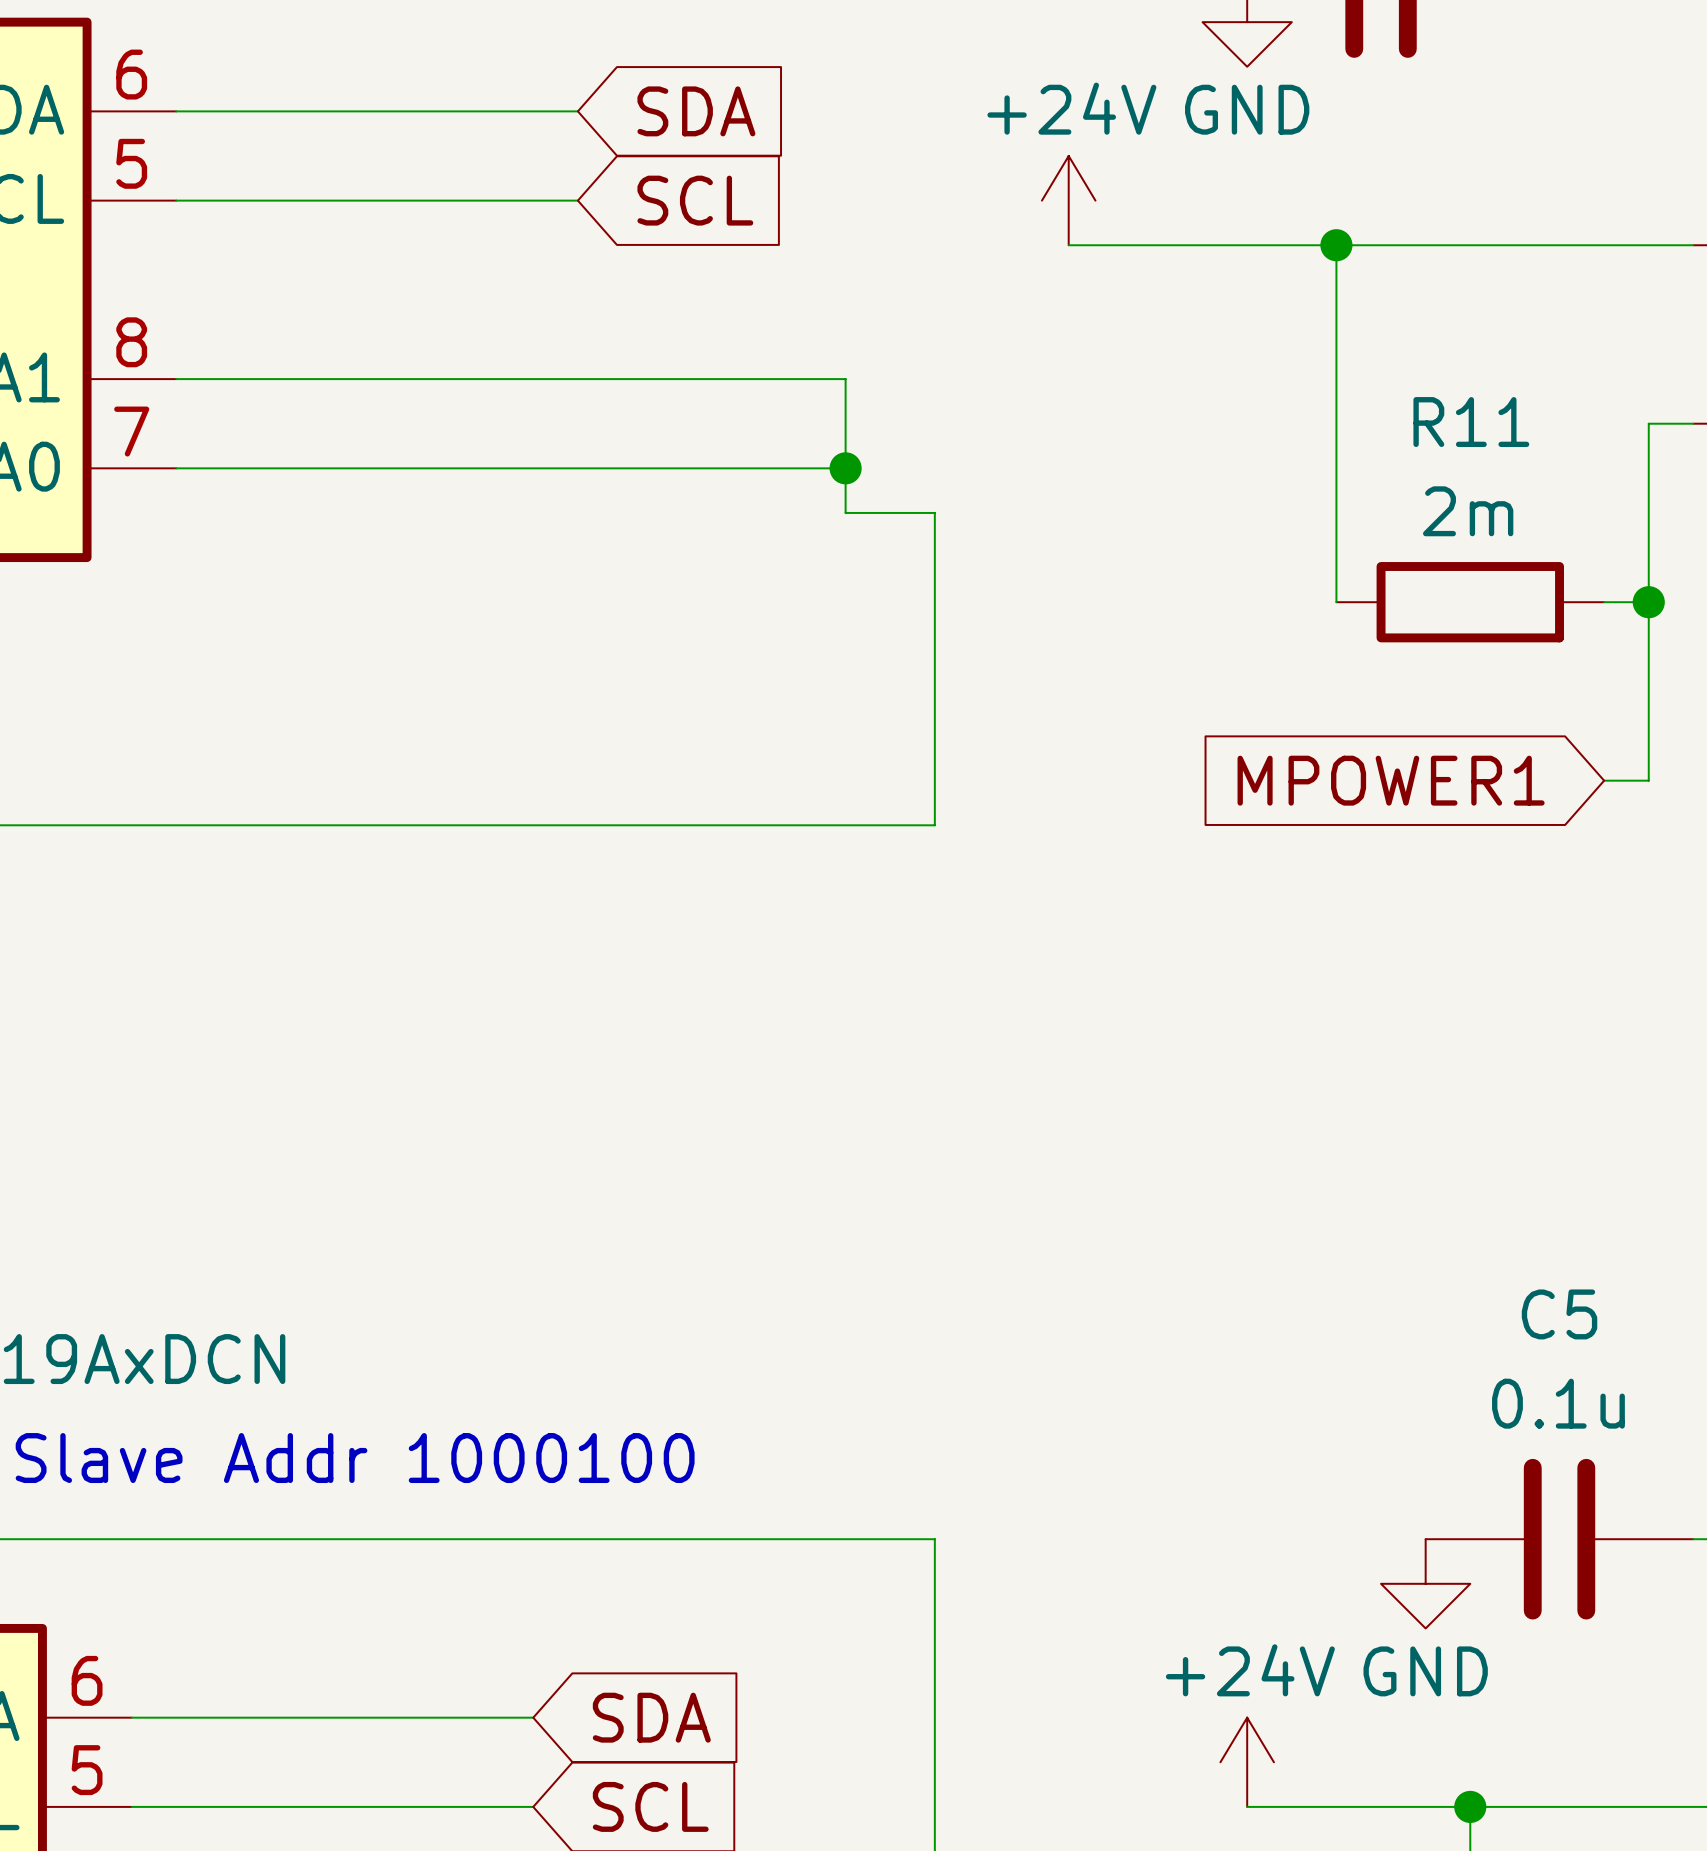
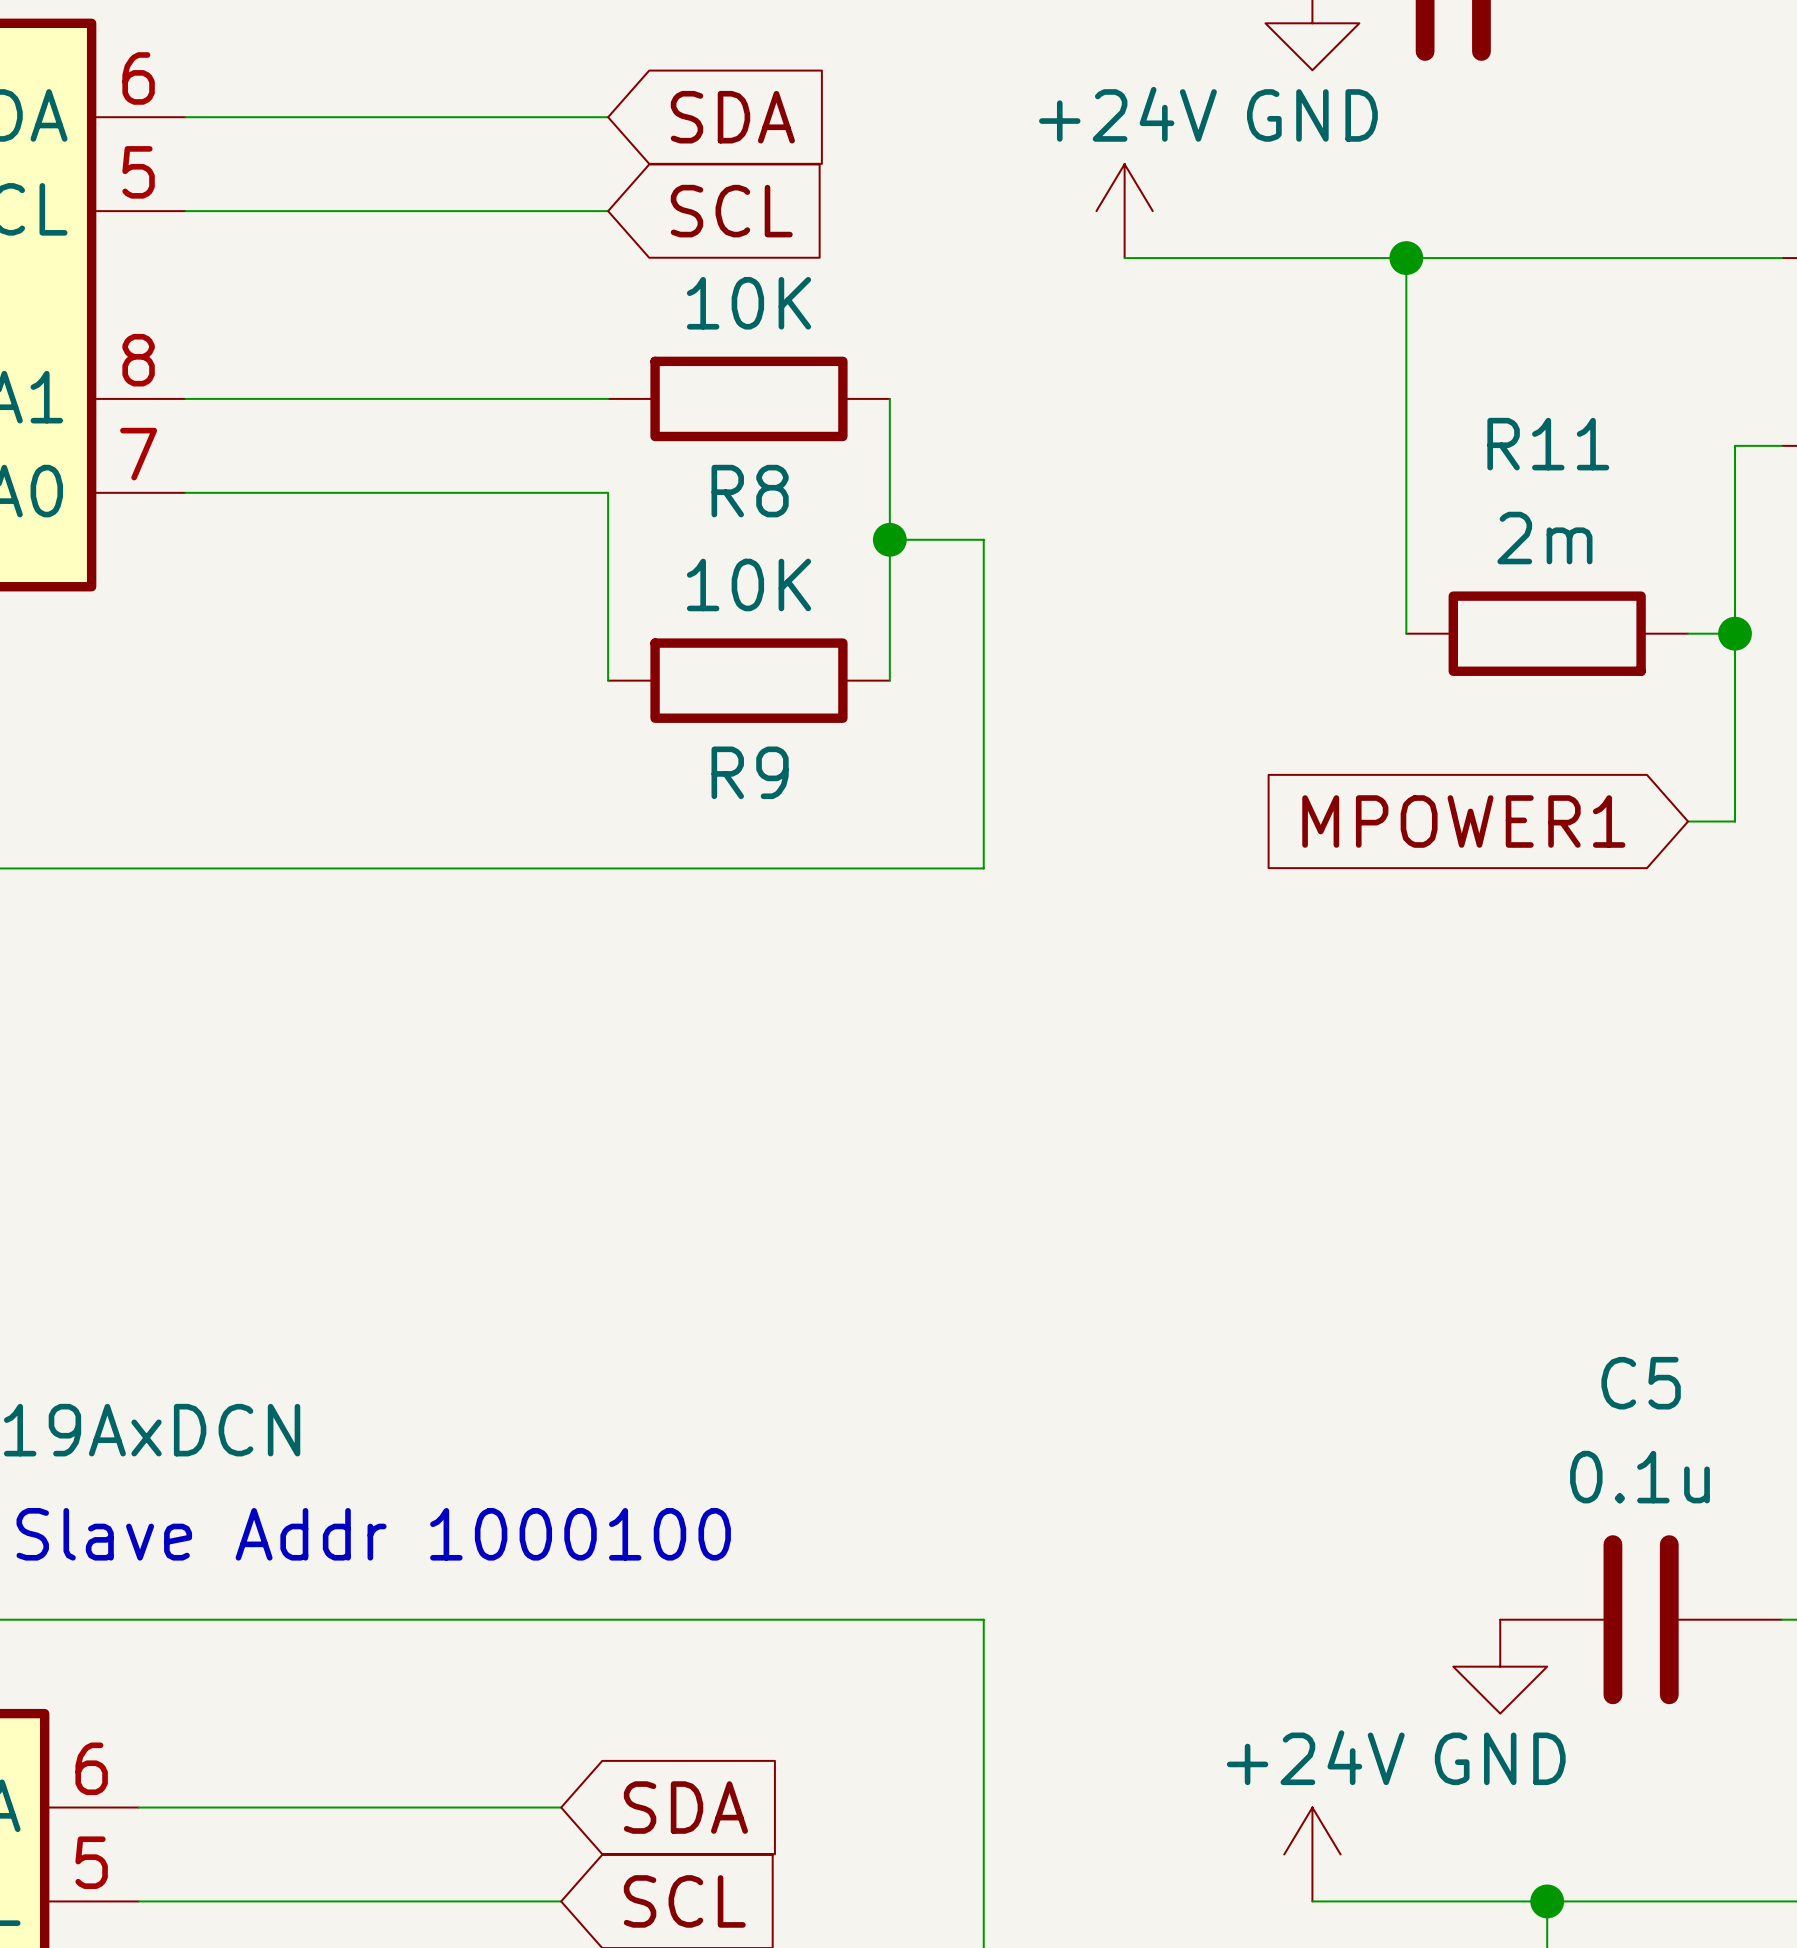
wire: (577, 379) (845, 379) -> none
R8: none -> 10K (748, 398)
wire: (577, 468) (845, 468) -> (608, 492) (608, 680)
junction position: (845, 468) -> (889, 539)
wire: none -> (889, 539) (889, 680)
R9: none -> 10K (748, 680)

